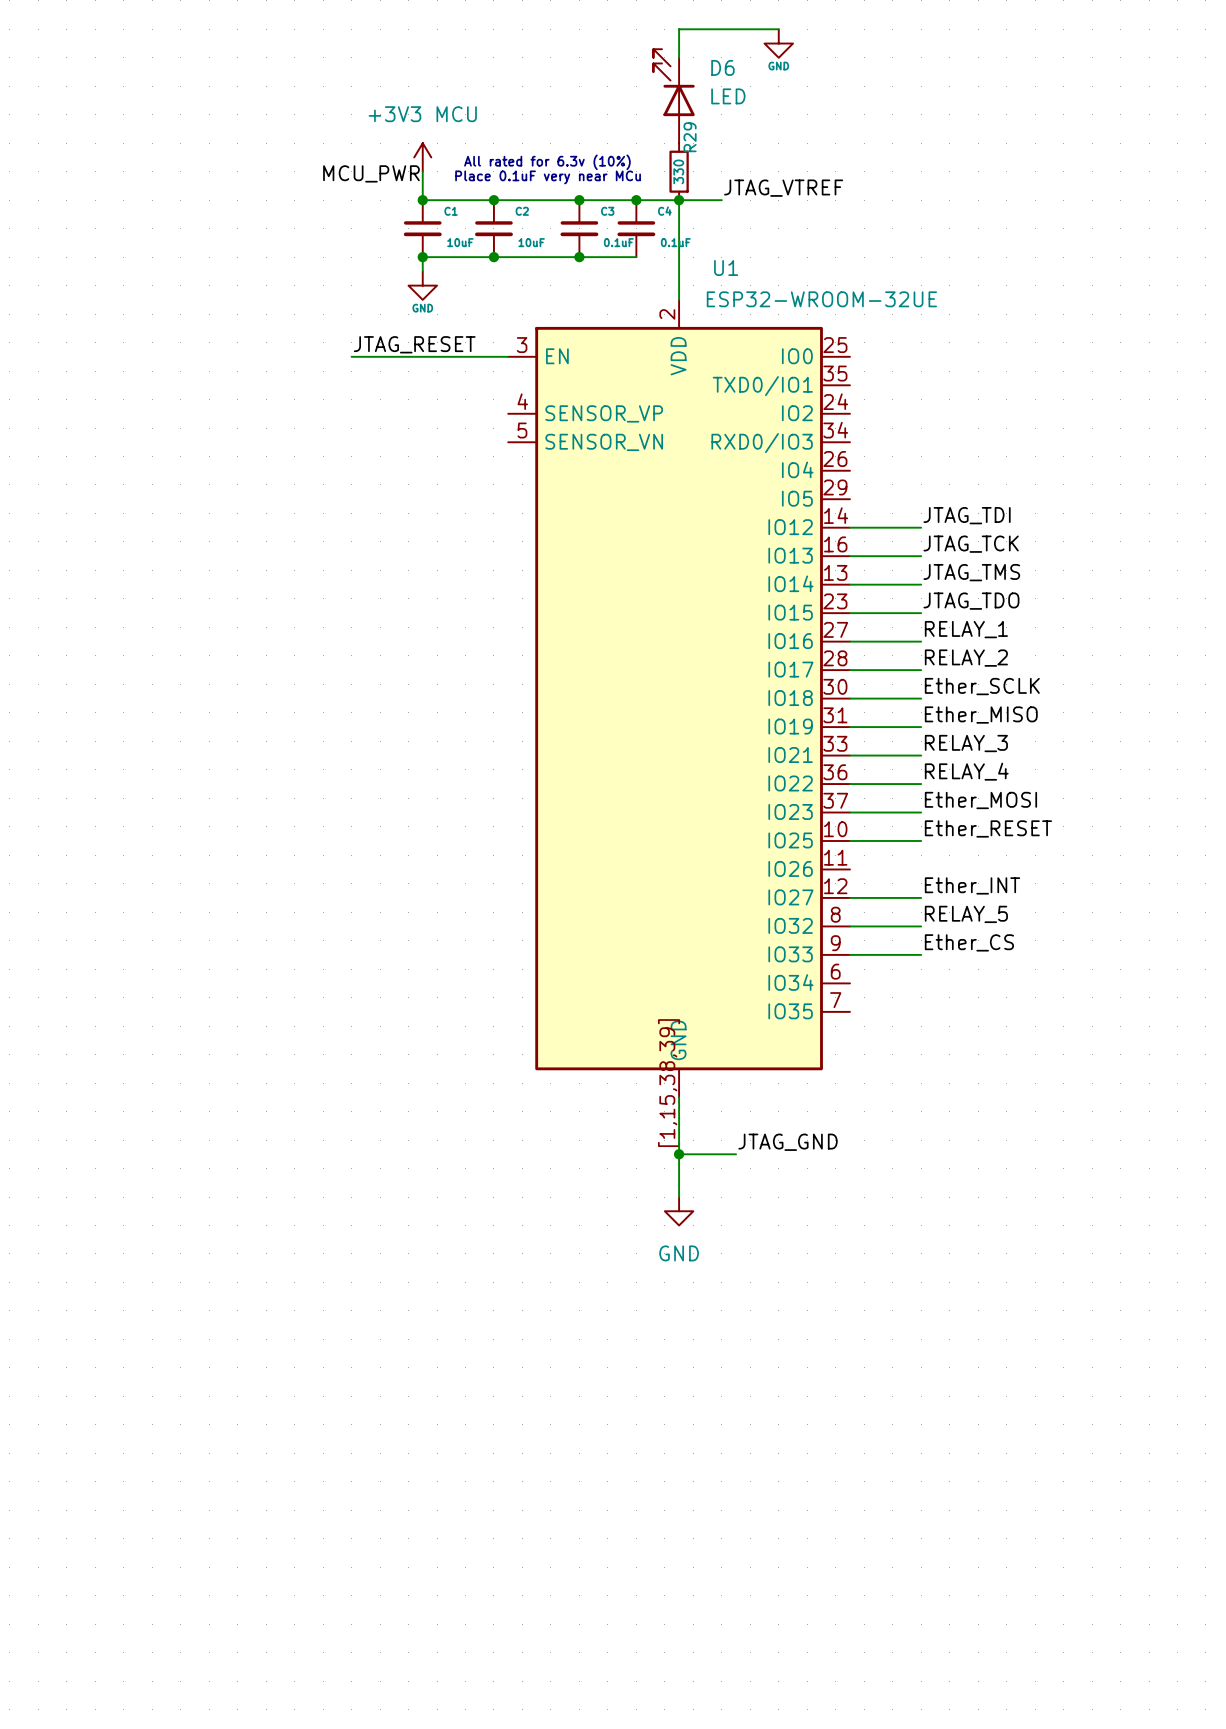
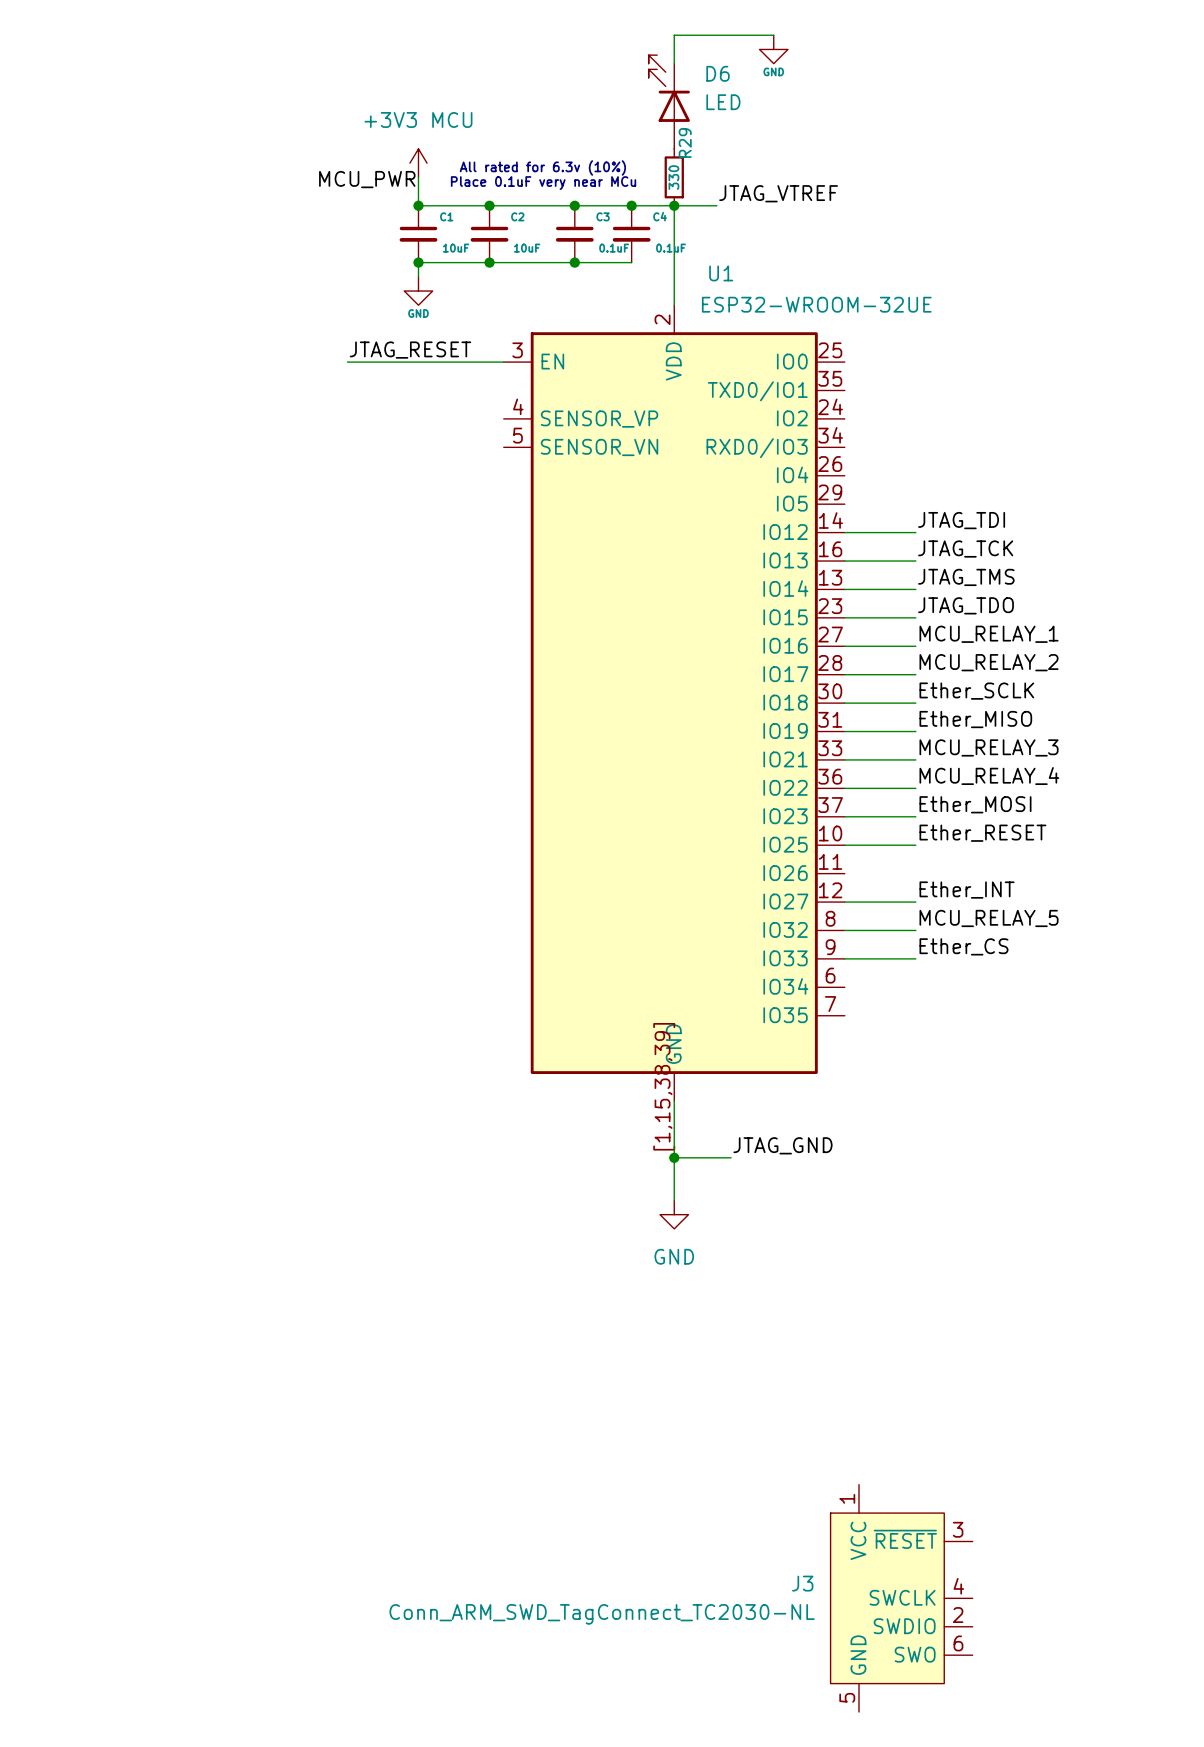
label: RELAY_1 (966, 629) -> MCU_RELAY_1 (989, 634)
label: RELAY_2 (966, 658) -> MCU_RELAY_2 (989, 662)
label: RELAY_3 (966, 743) -> MCU_RELAY_3 (989, 747)
label: RELAY_4 (966, 771) -> MCU_RELAY_4 (989, 776)
label: RELAY_5 (966, 914) -> MCU_RELAY_5 (989, 918)
J3: none -> Conn_ARM_SWD_TagConnect_TC2030-NL (901, 1598)

